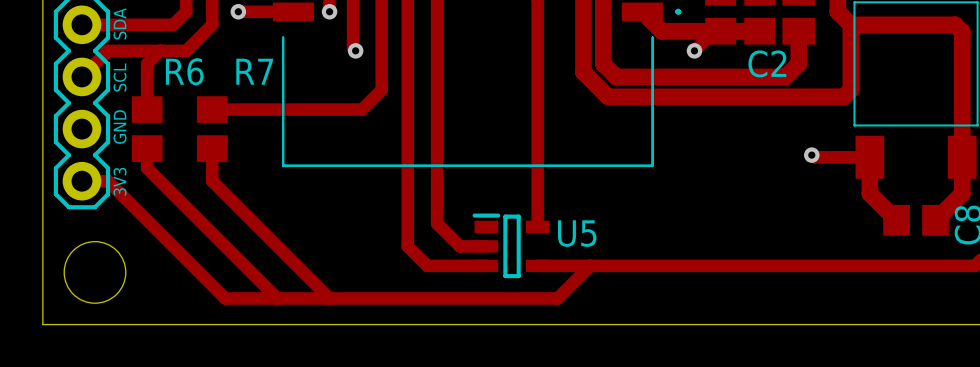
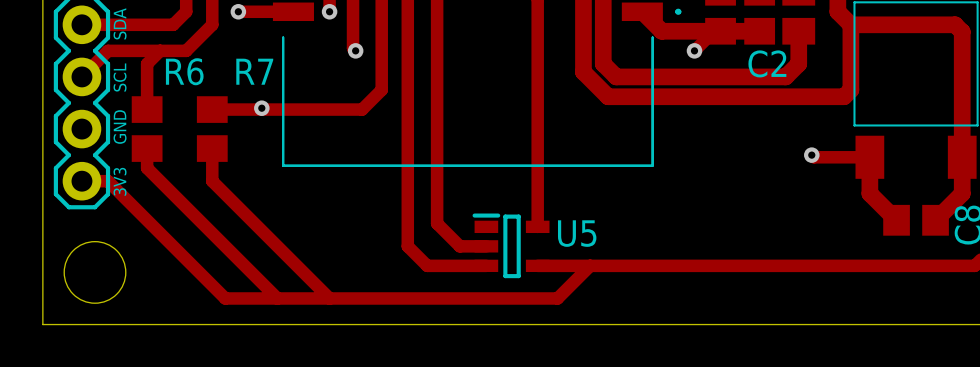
via: none -> (261, 108)

